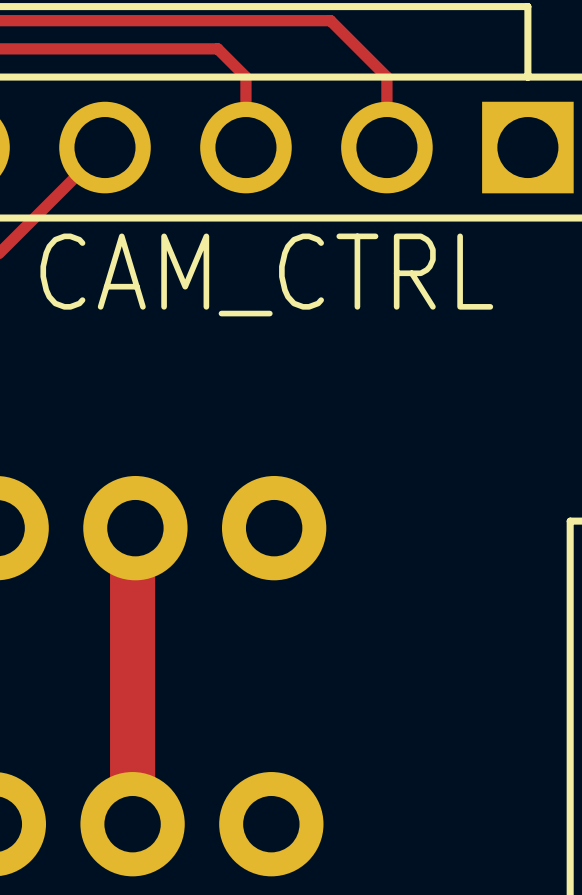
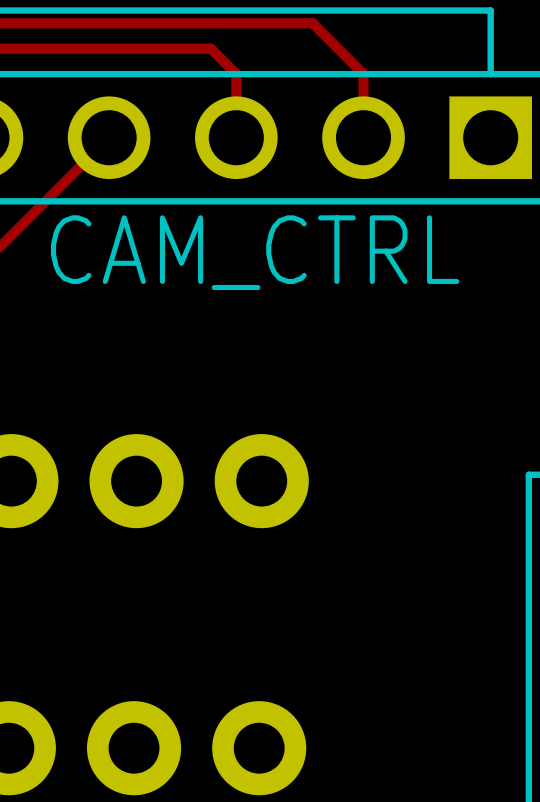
track: (135, 528) (132, 530) (132, 824) -> none

